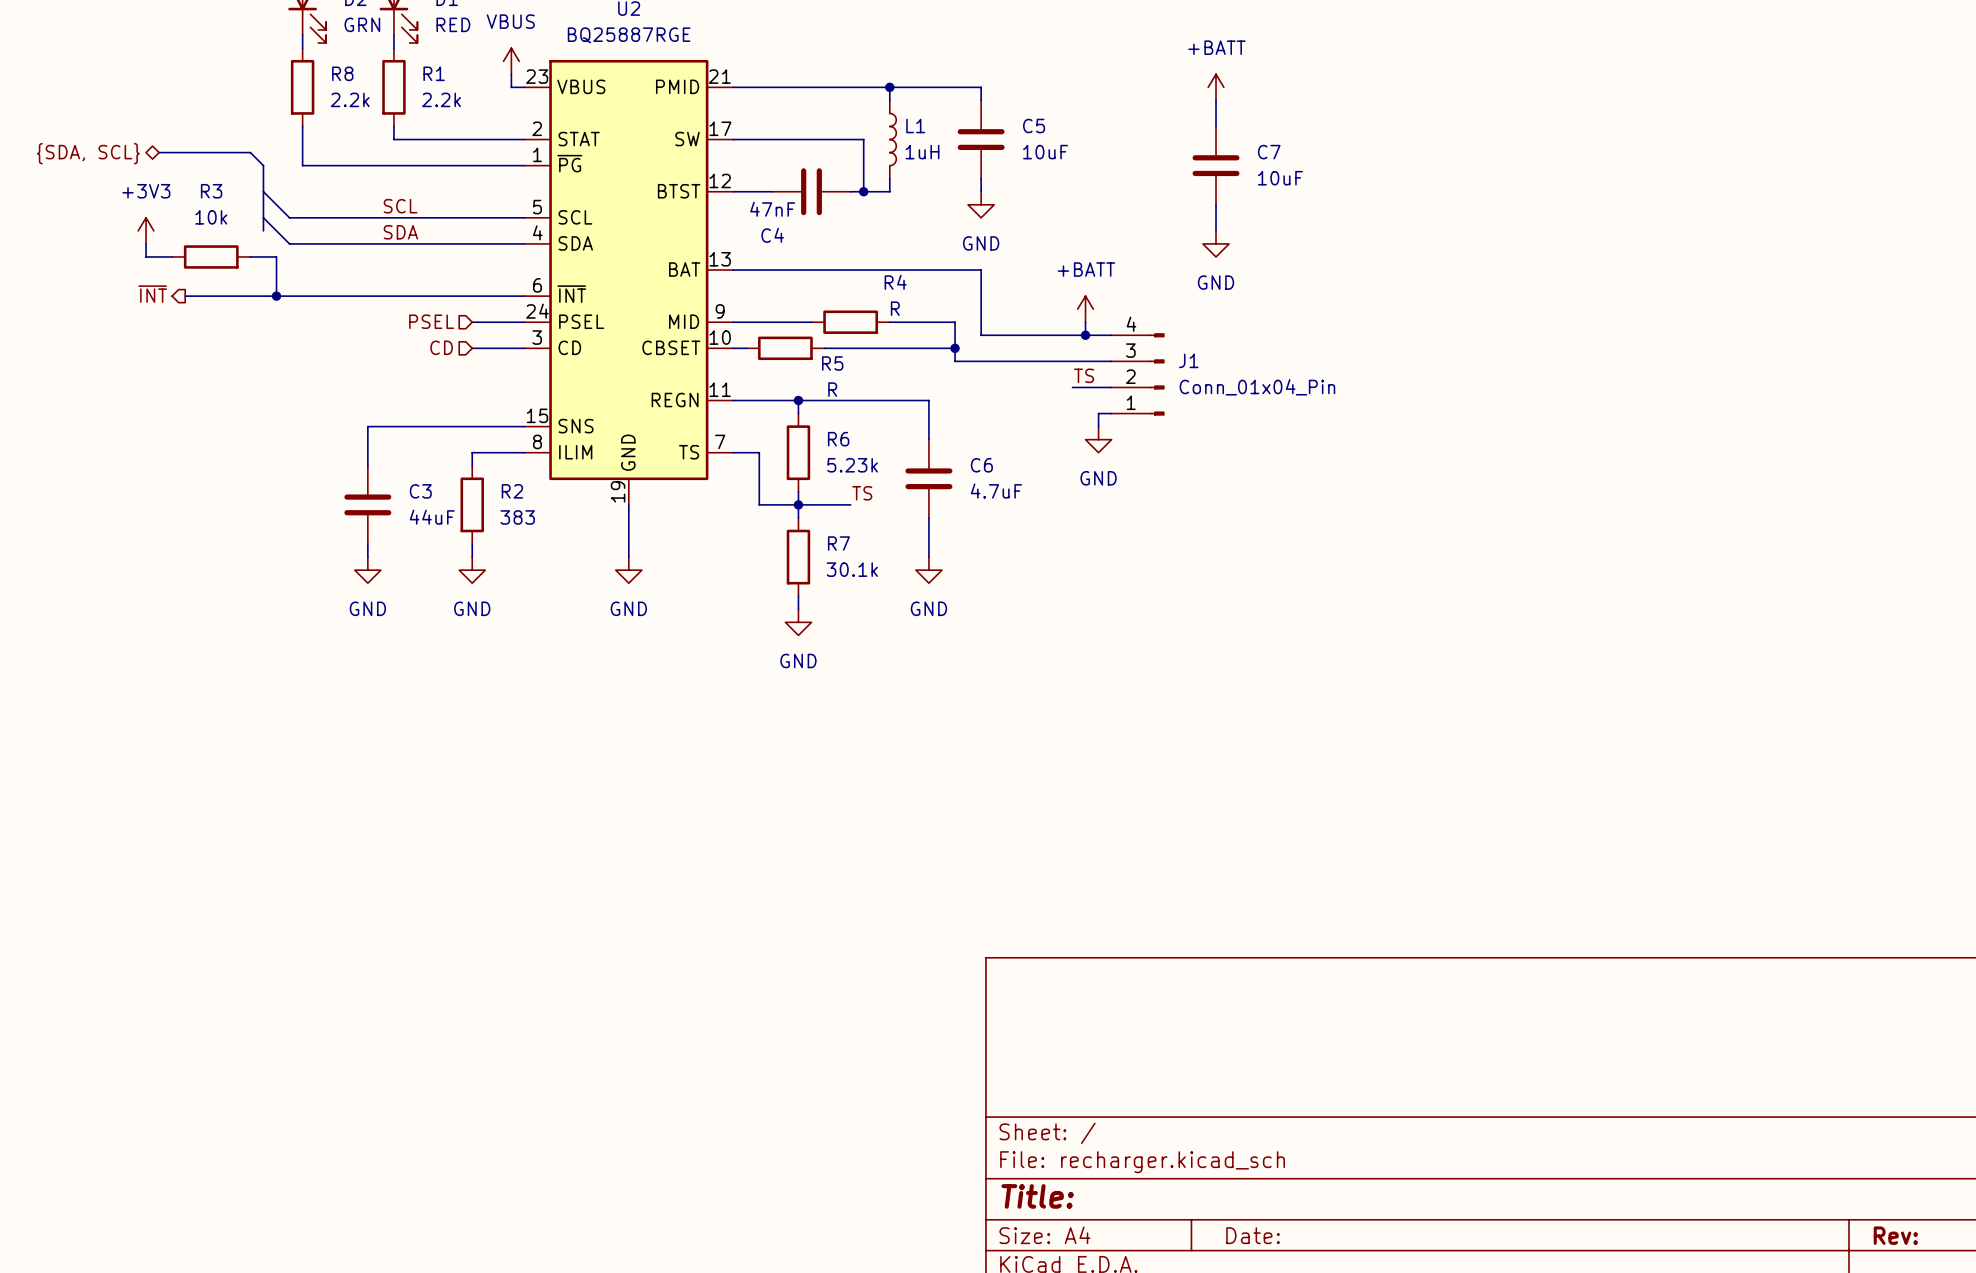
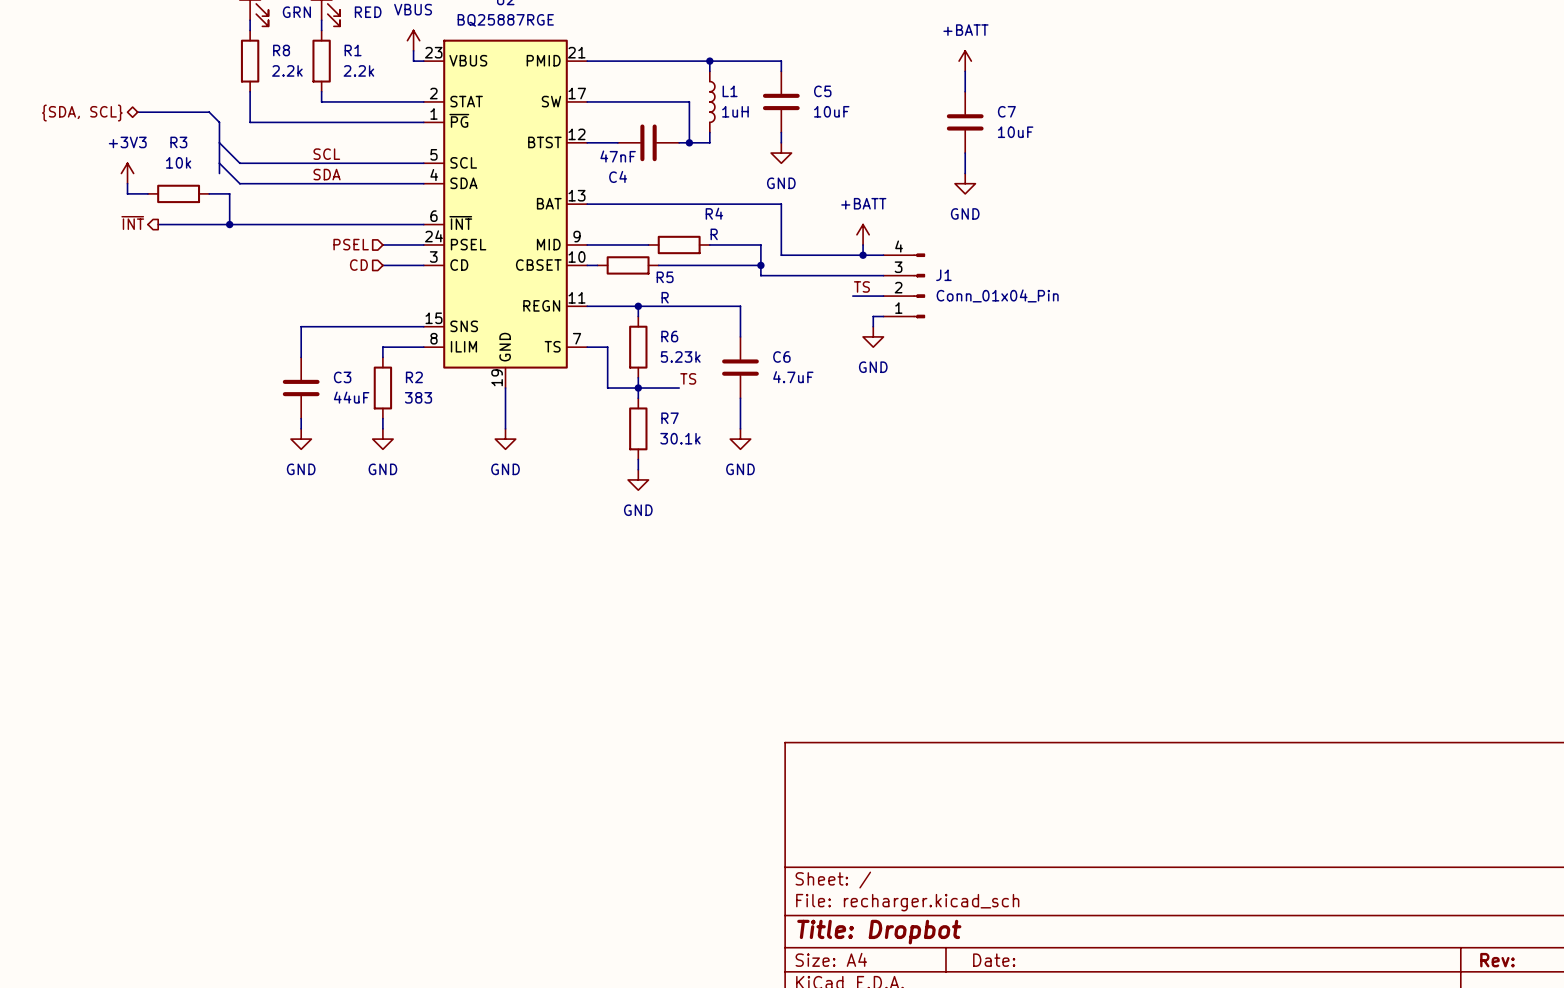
title block: Title: (1037, 1196) -> Title: Dropbot (879, 932)

